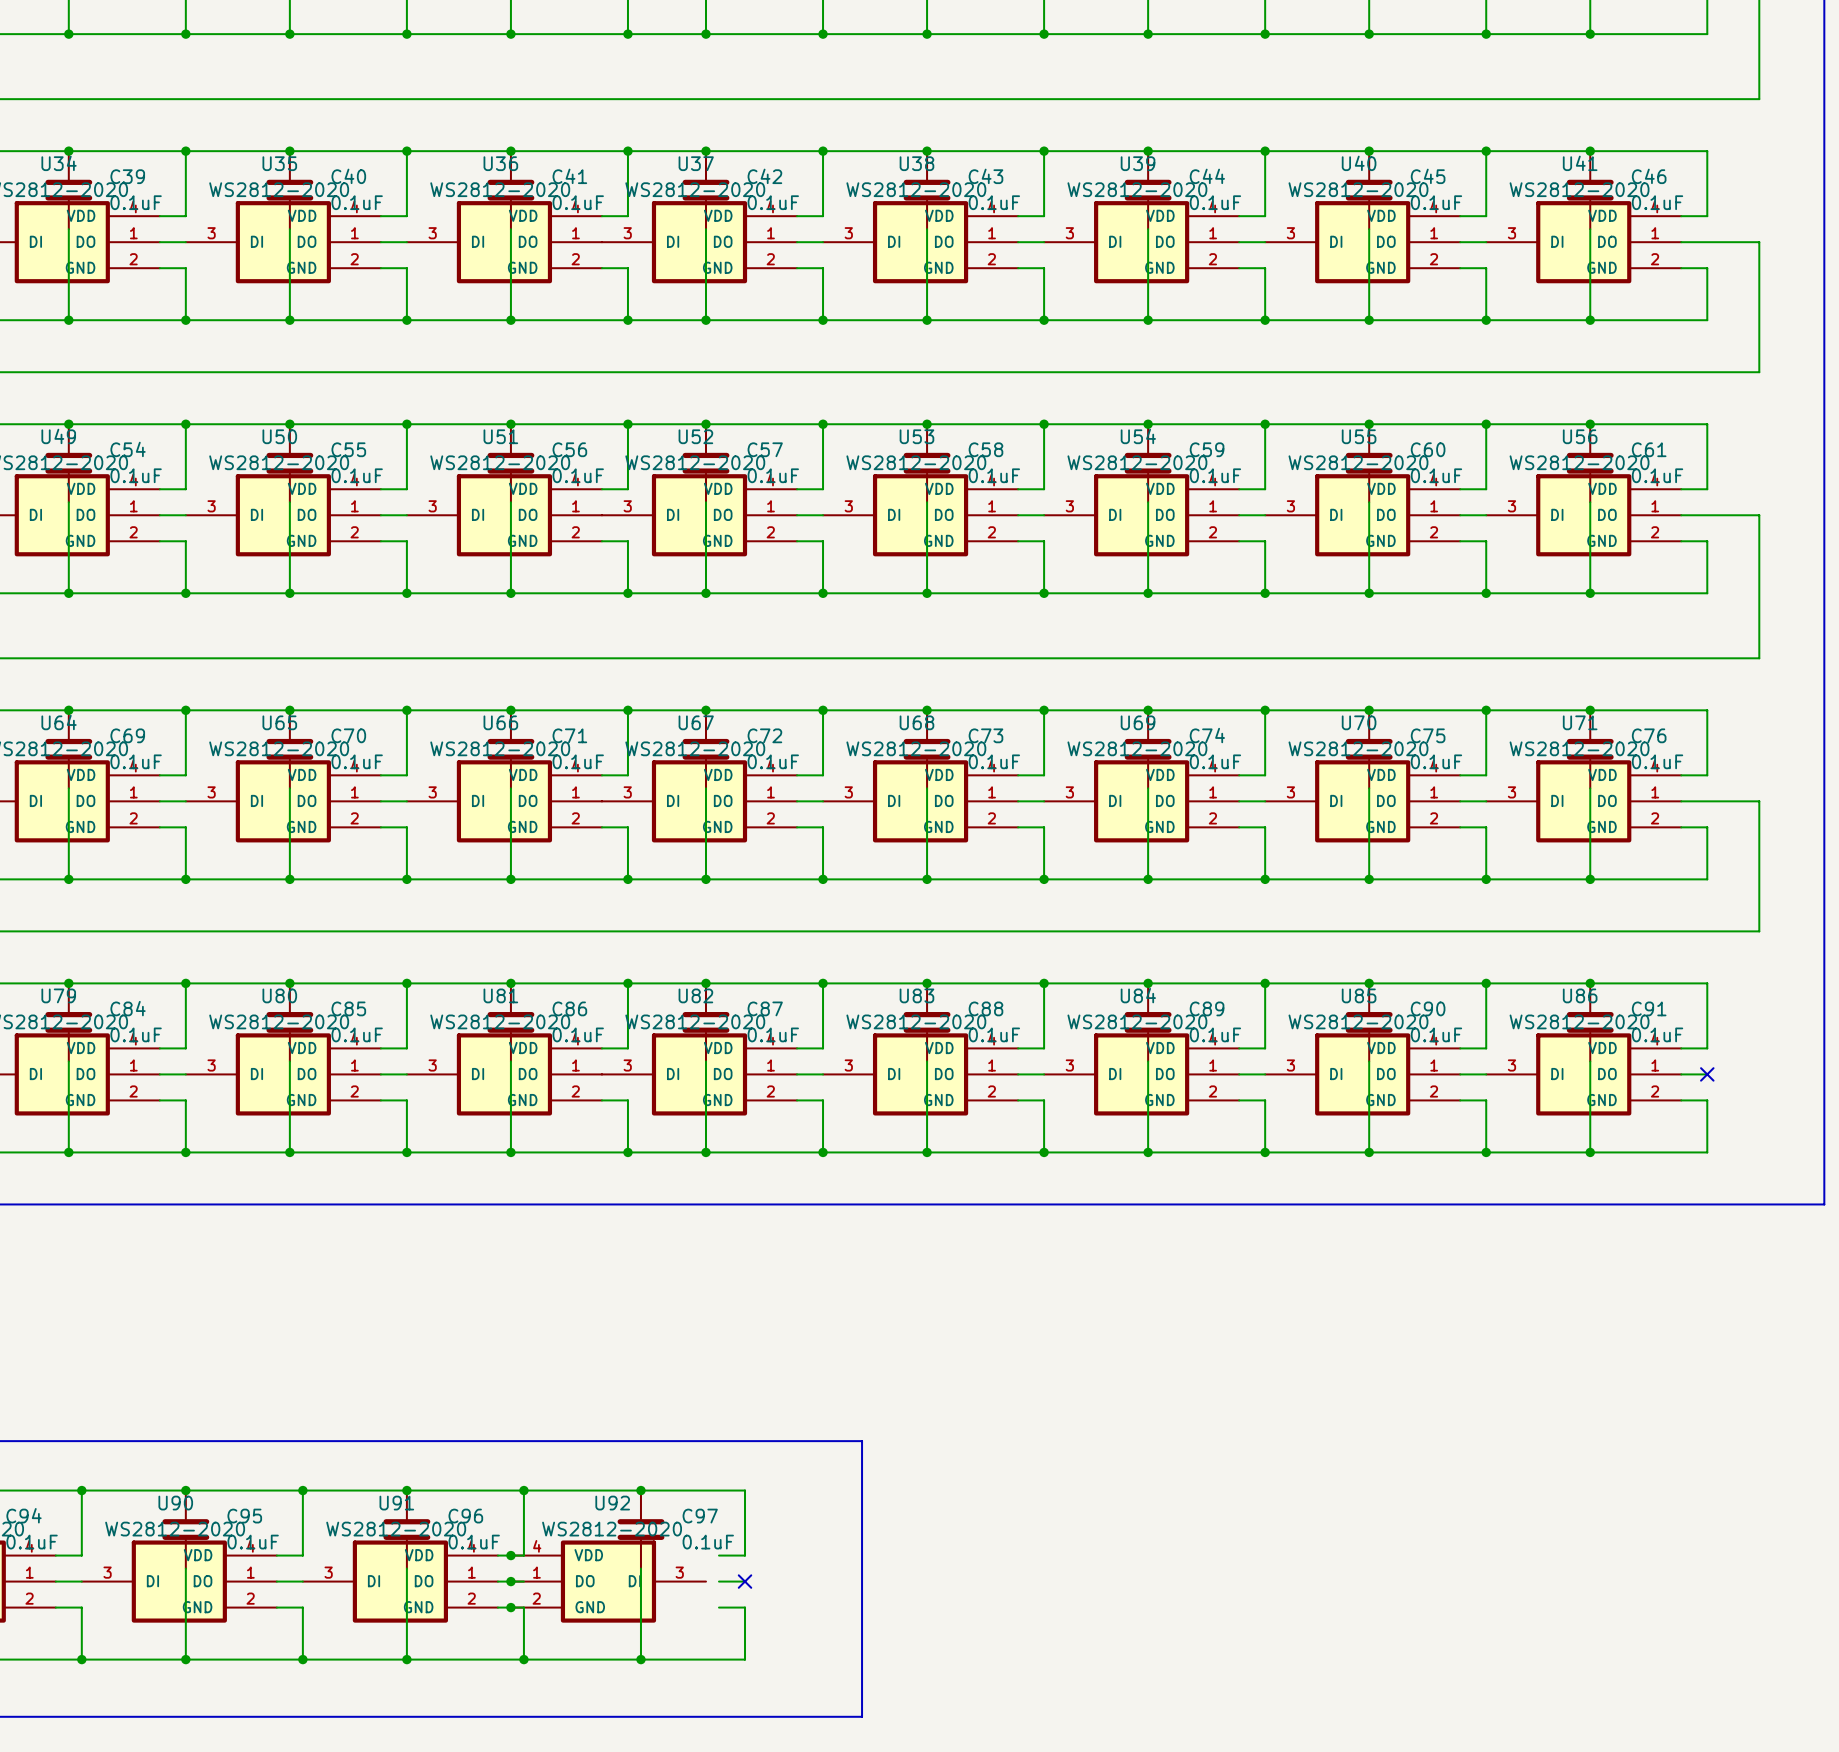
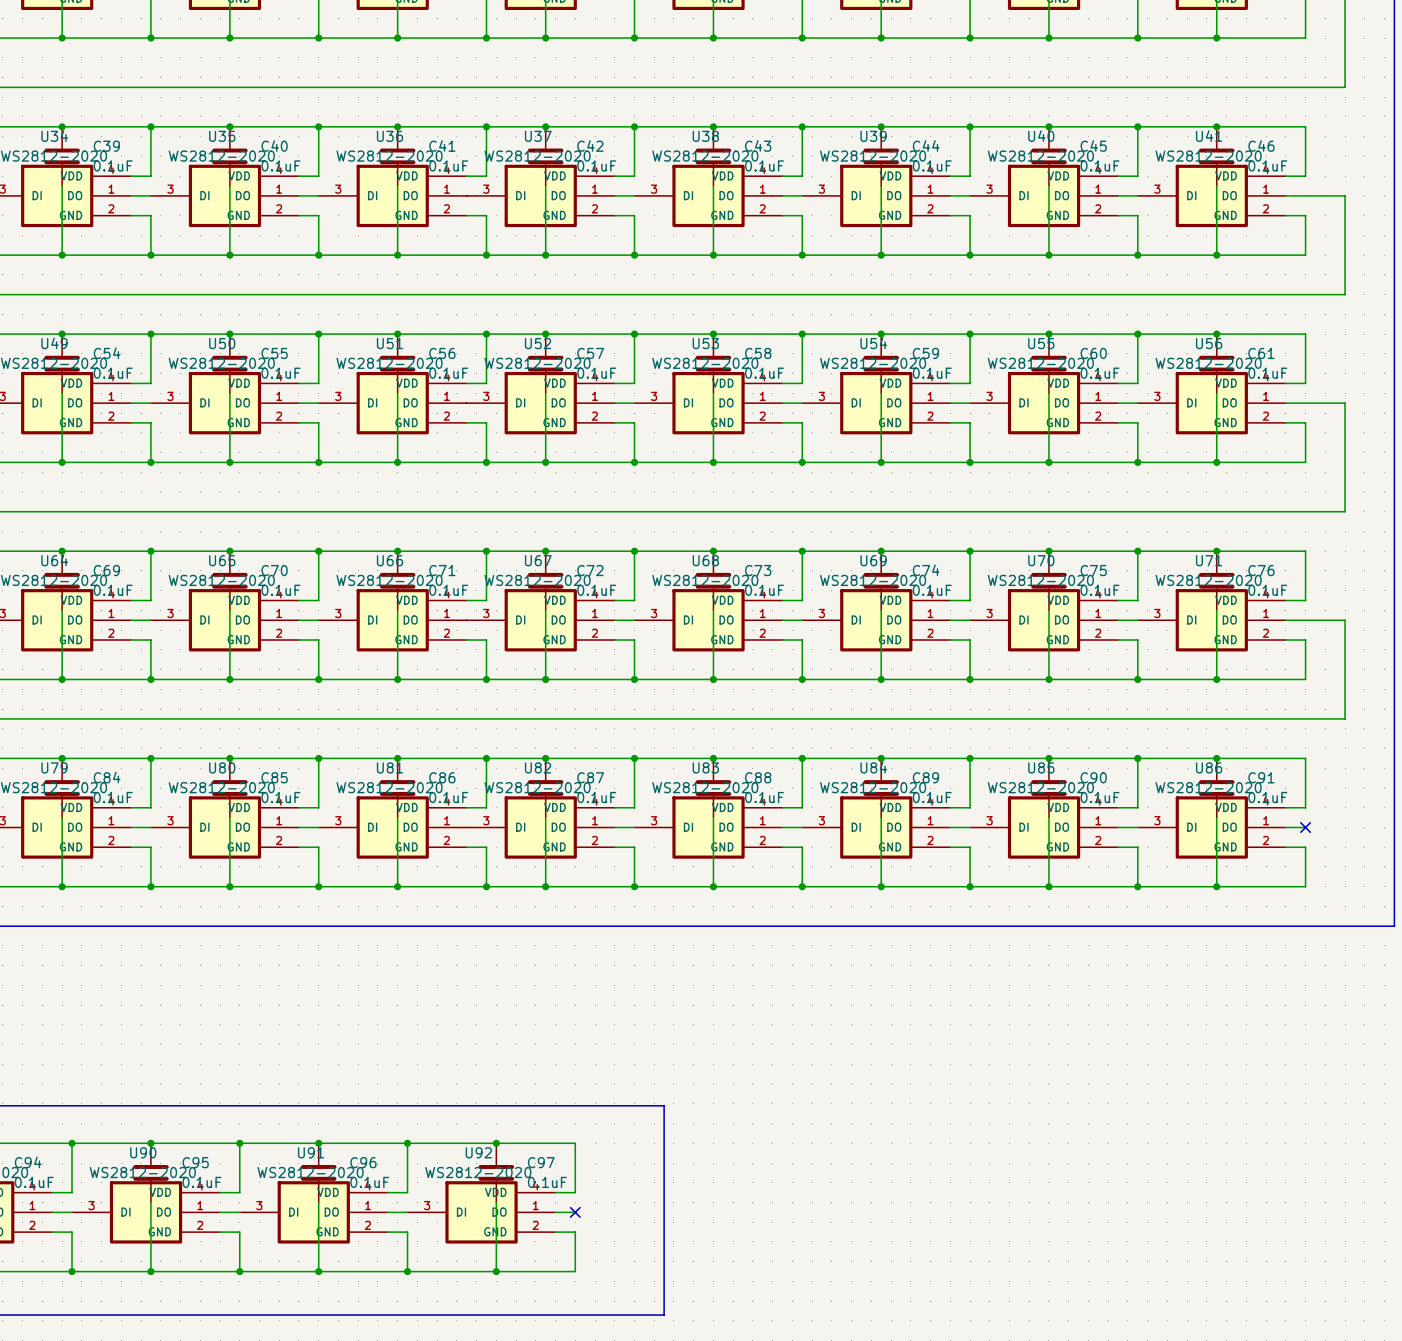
junction: (510, 1555) -> none
junction: (510, 1581) -> none
U92 flip: as is (608, 1581) -> left-right (481, 1212)
junction: (510, 1607) -> none

